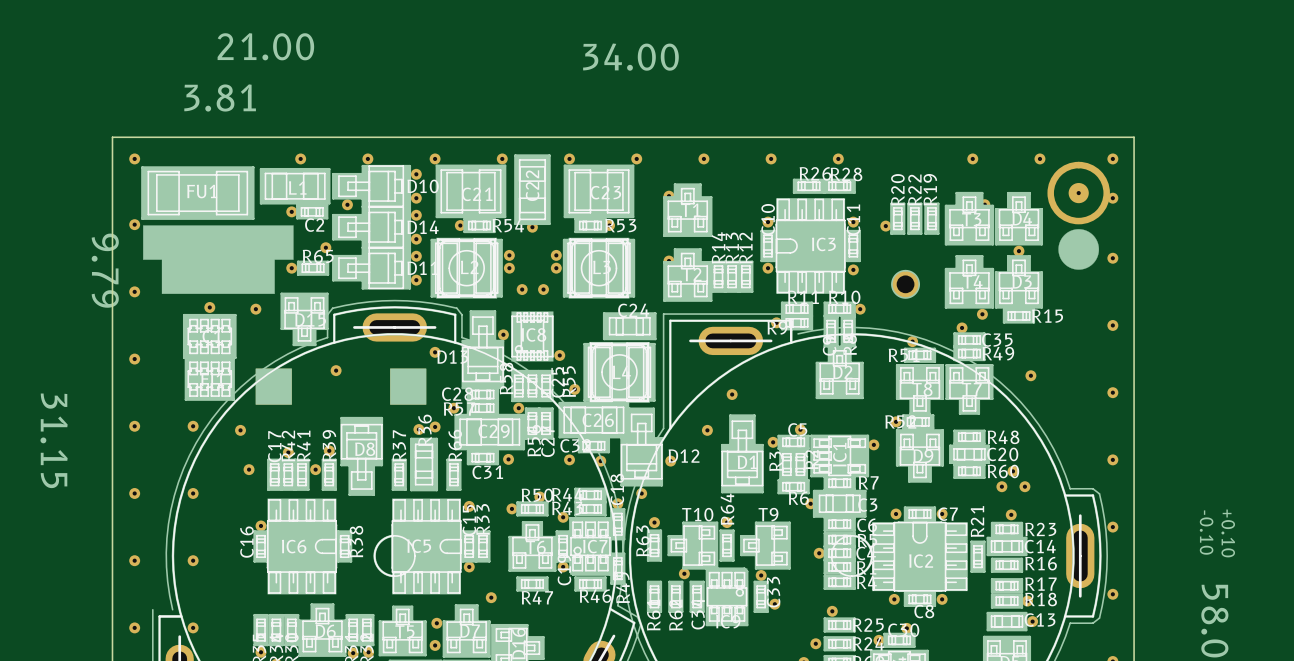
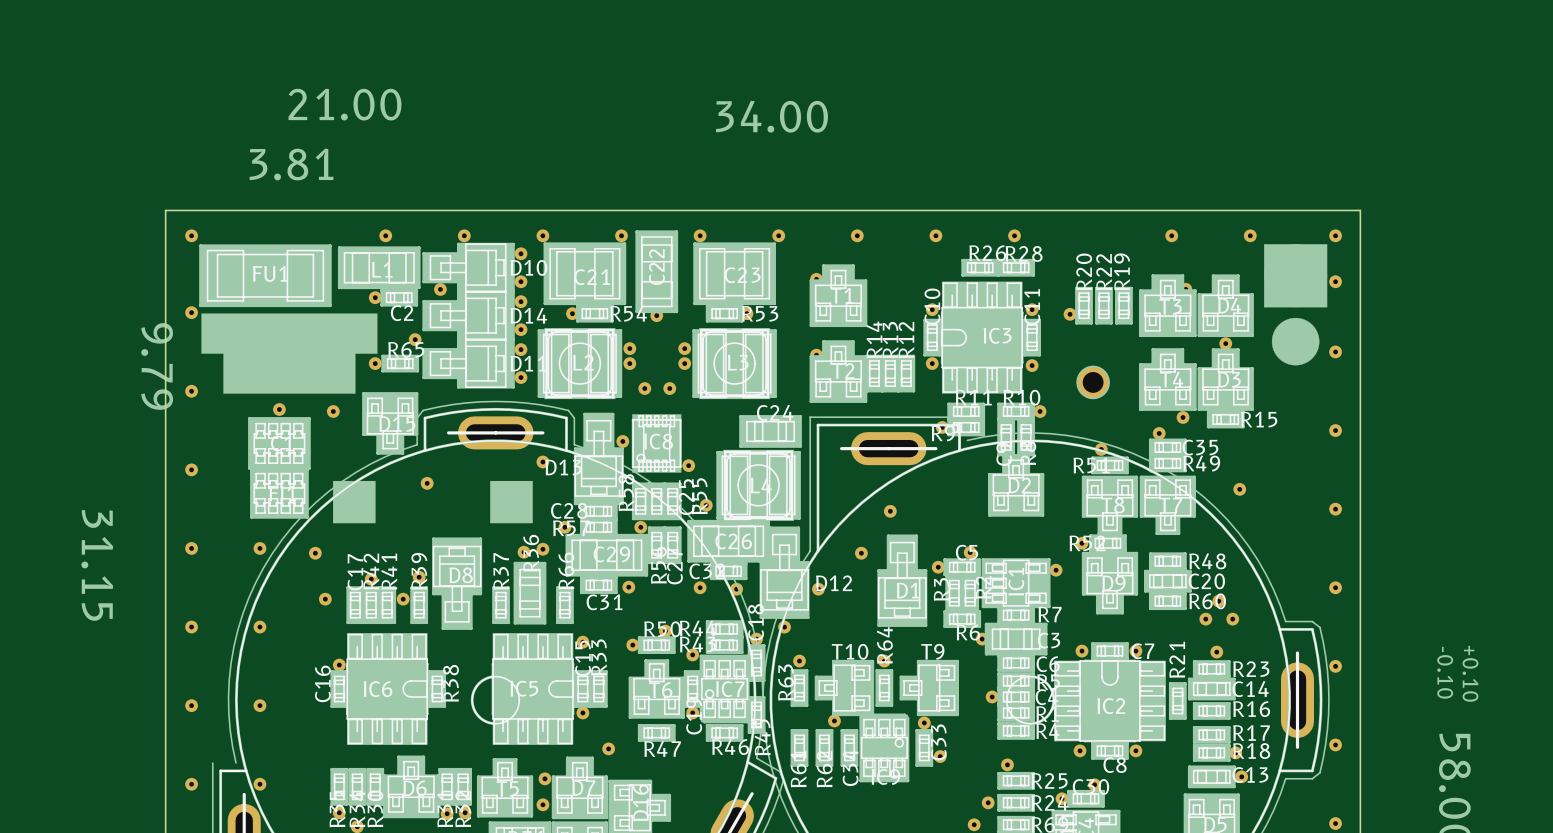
part footprint: [1047, 161, 1110, 225] -> [1264, 244, 1328, 308]

